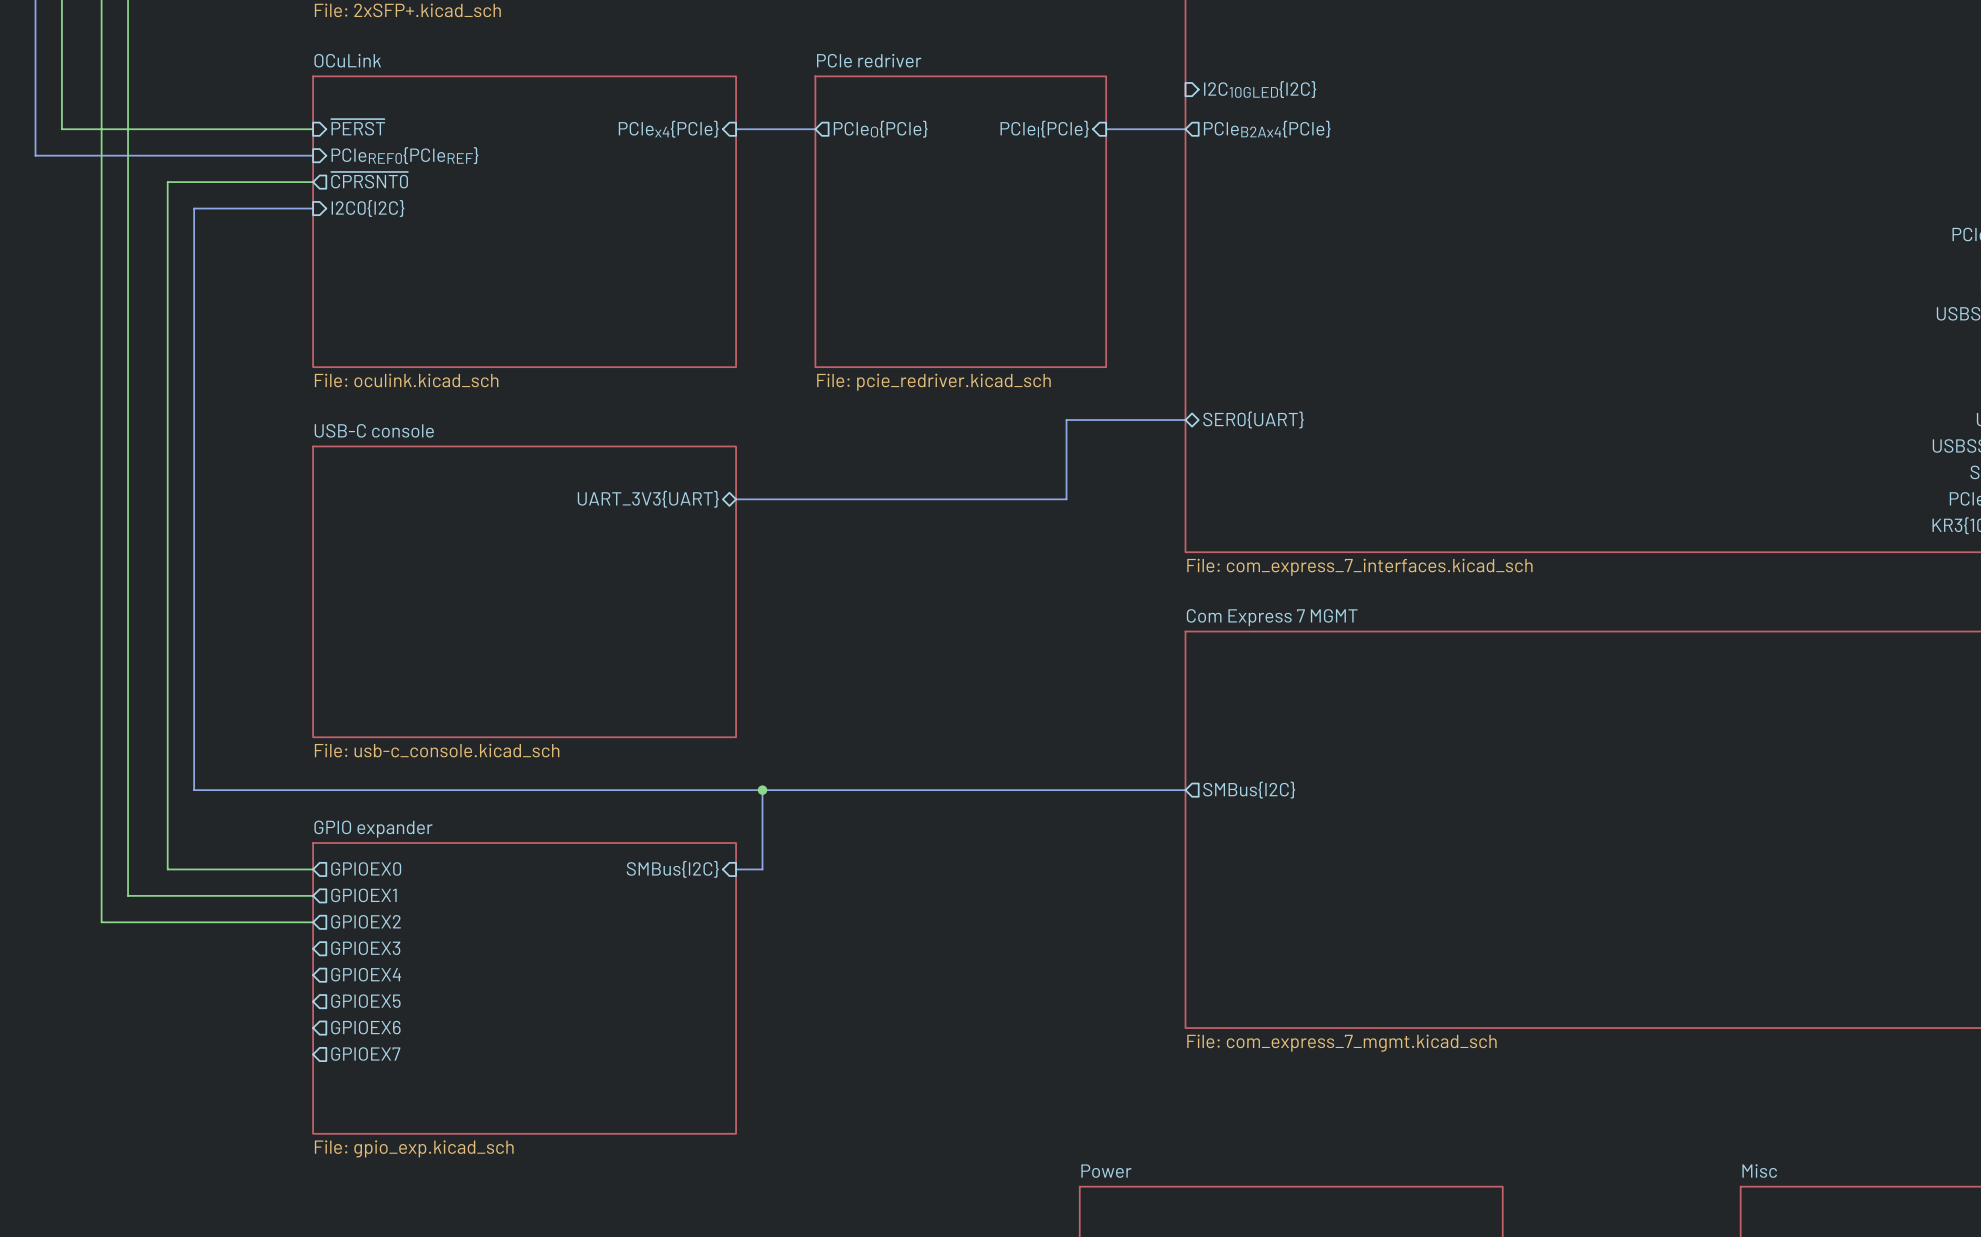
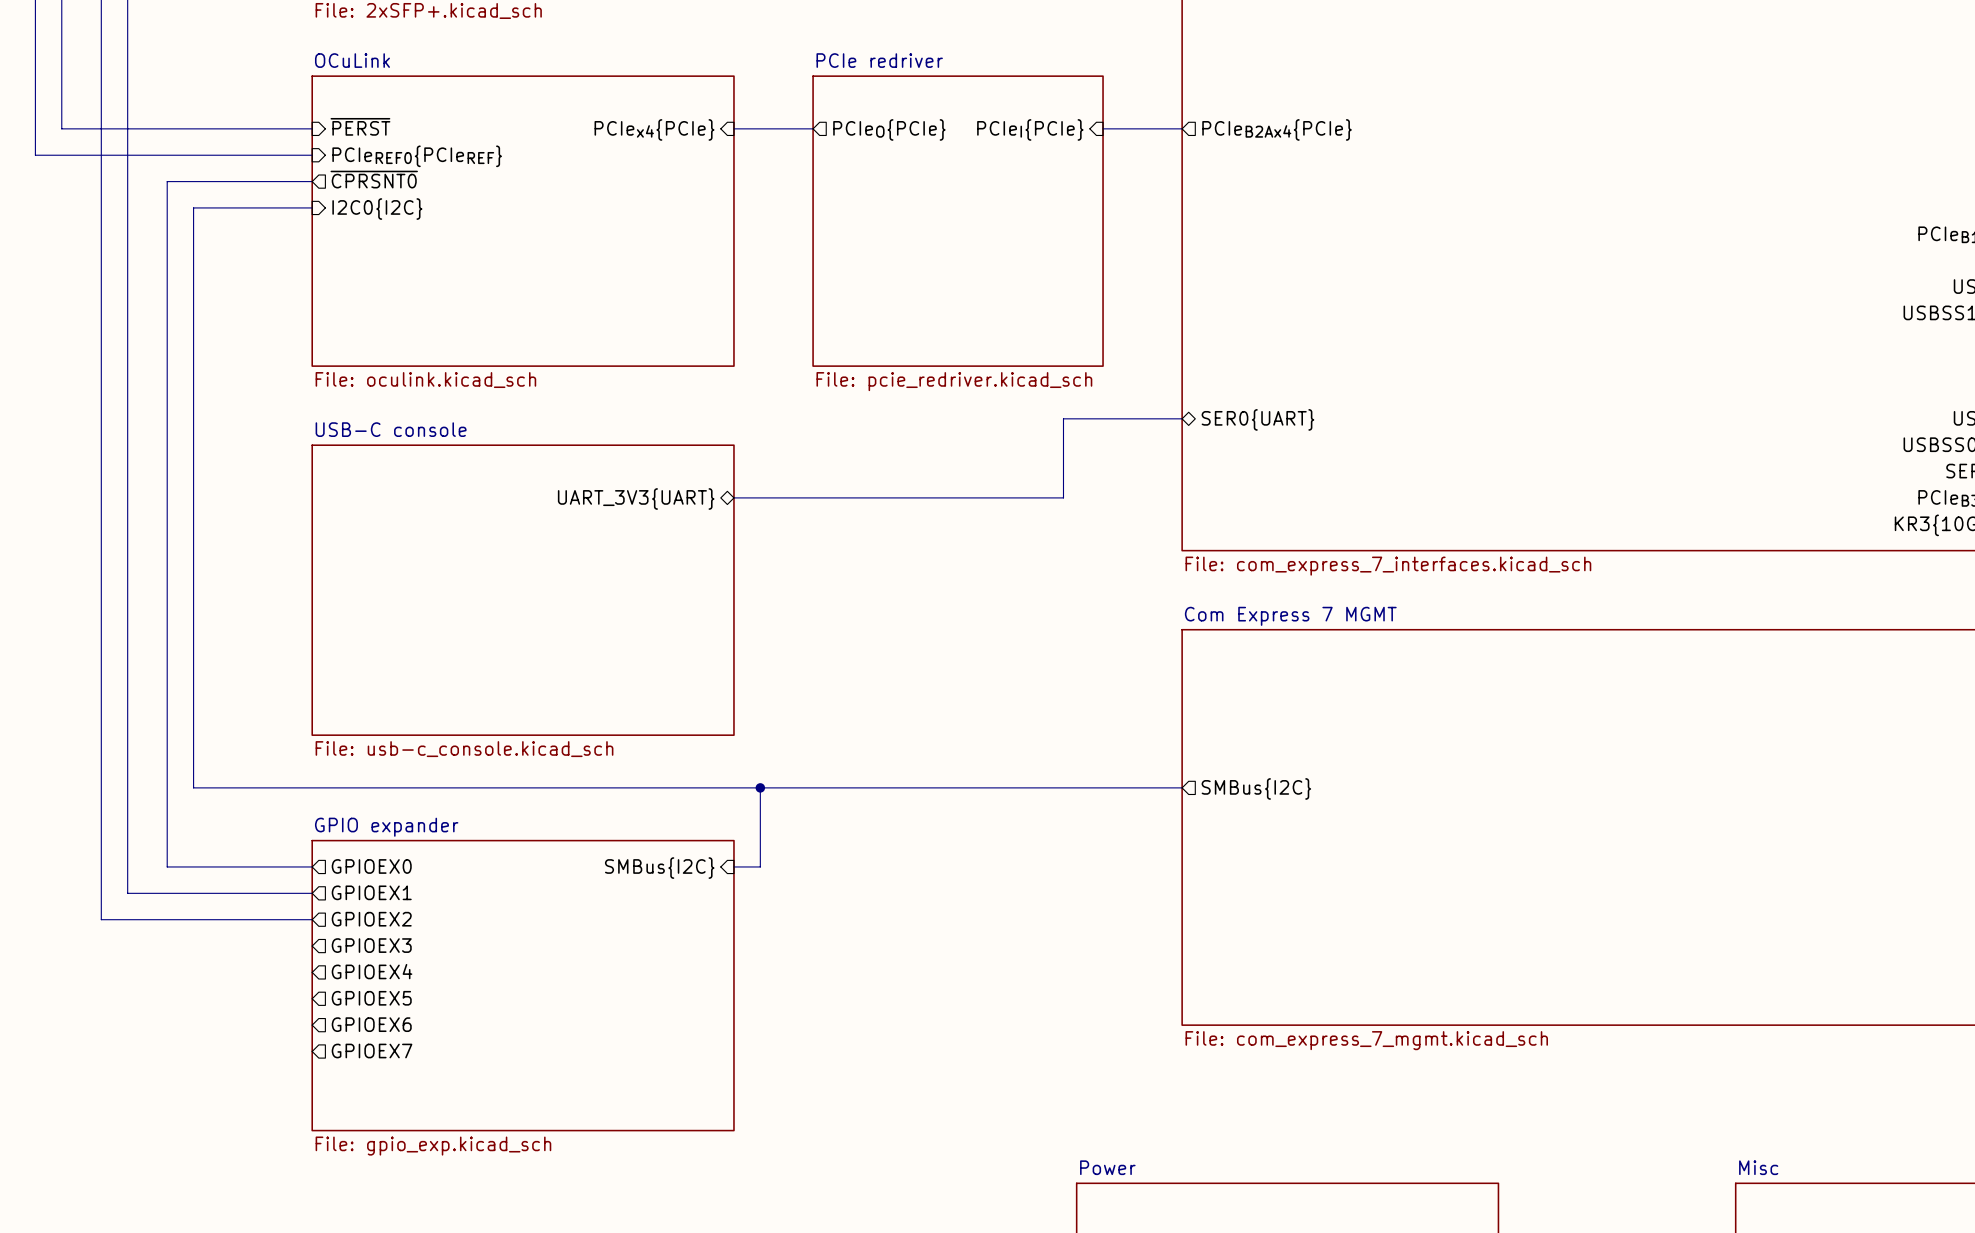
sheet pin: I2C10GLED{I2C} (1260, 89) -> none

